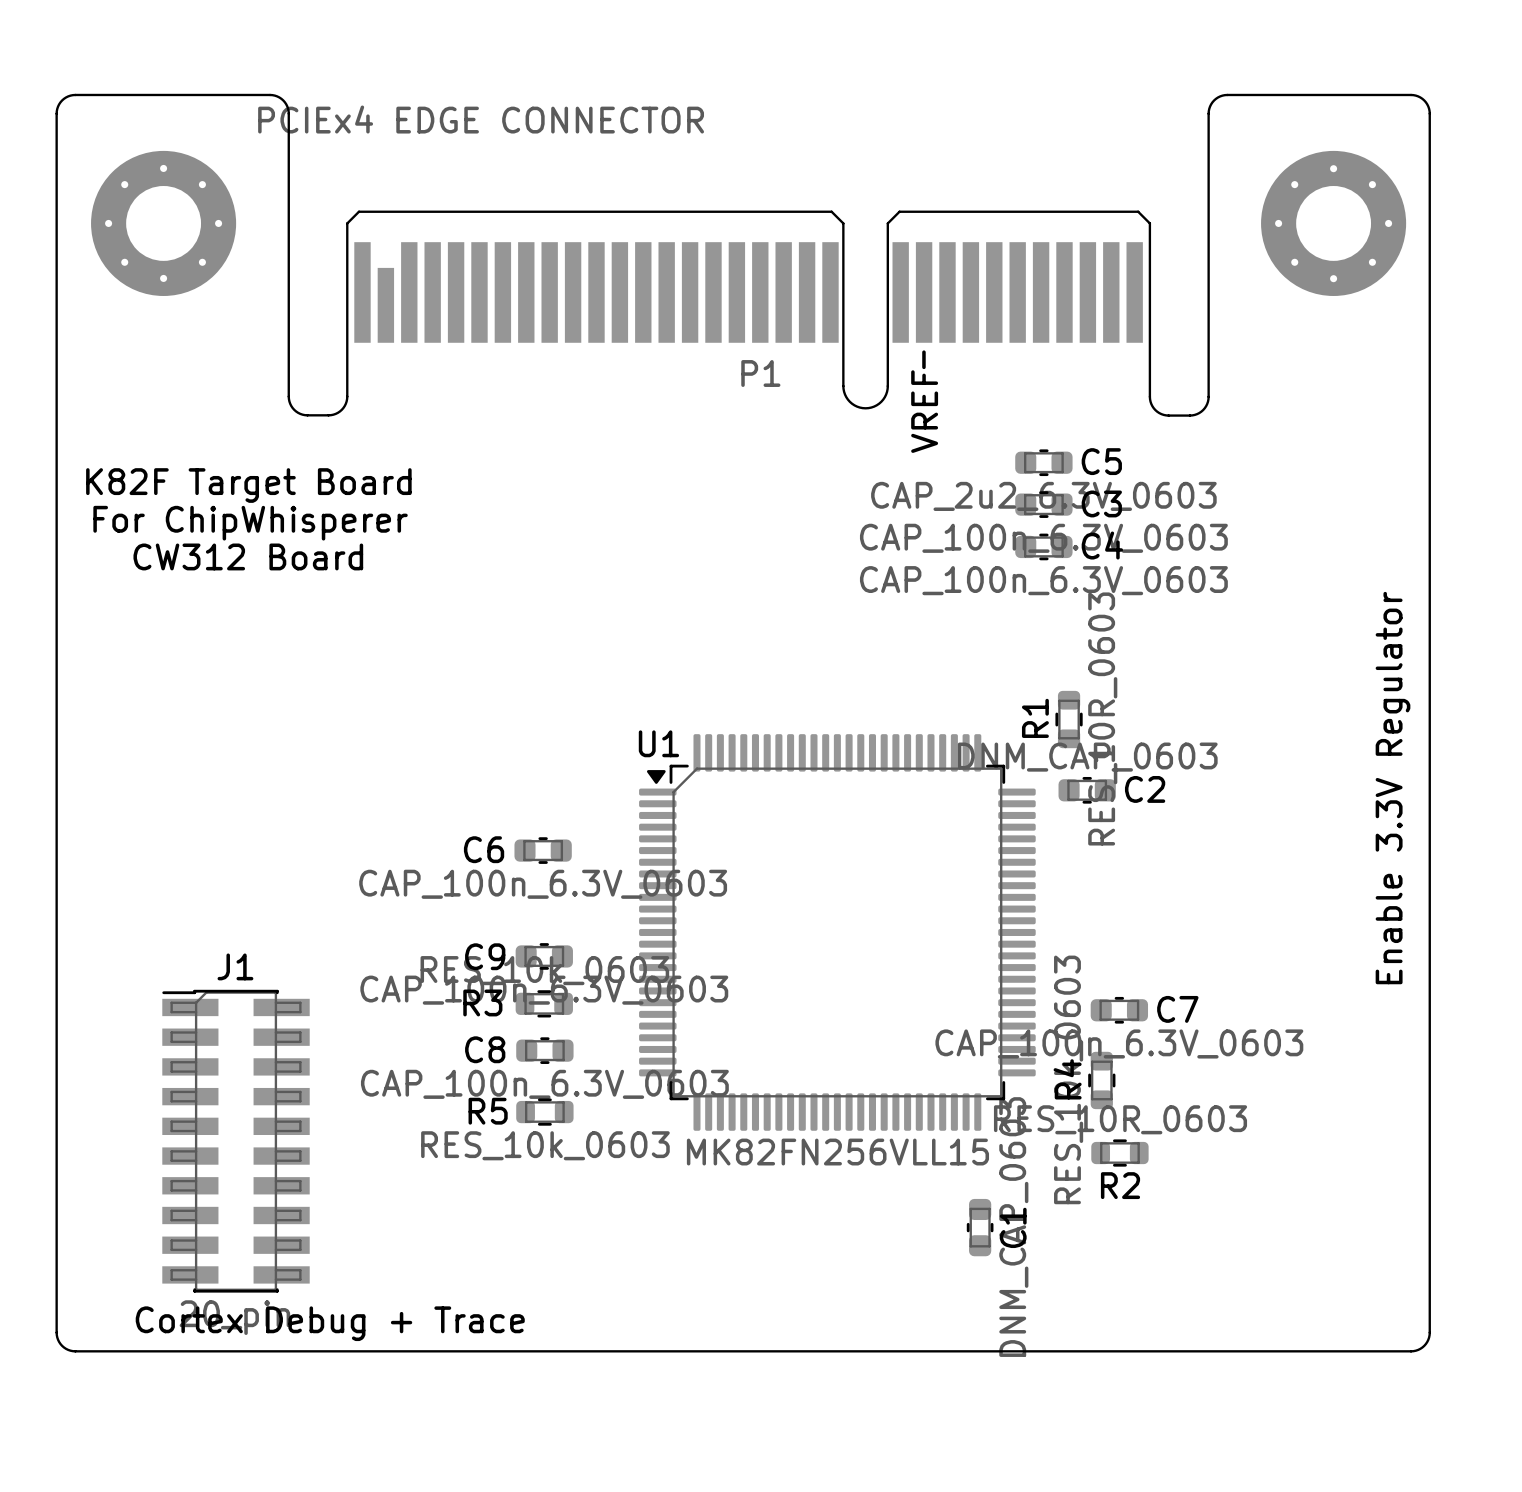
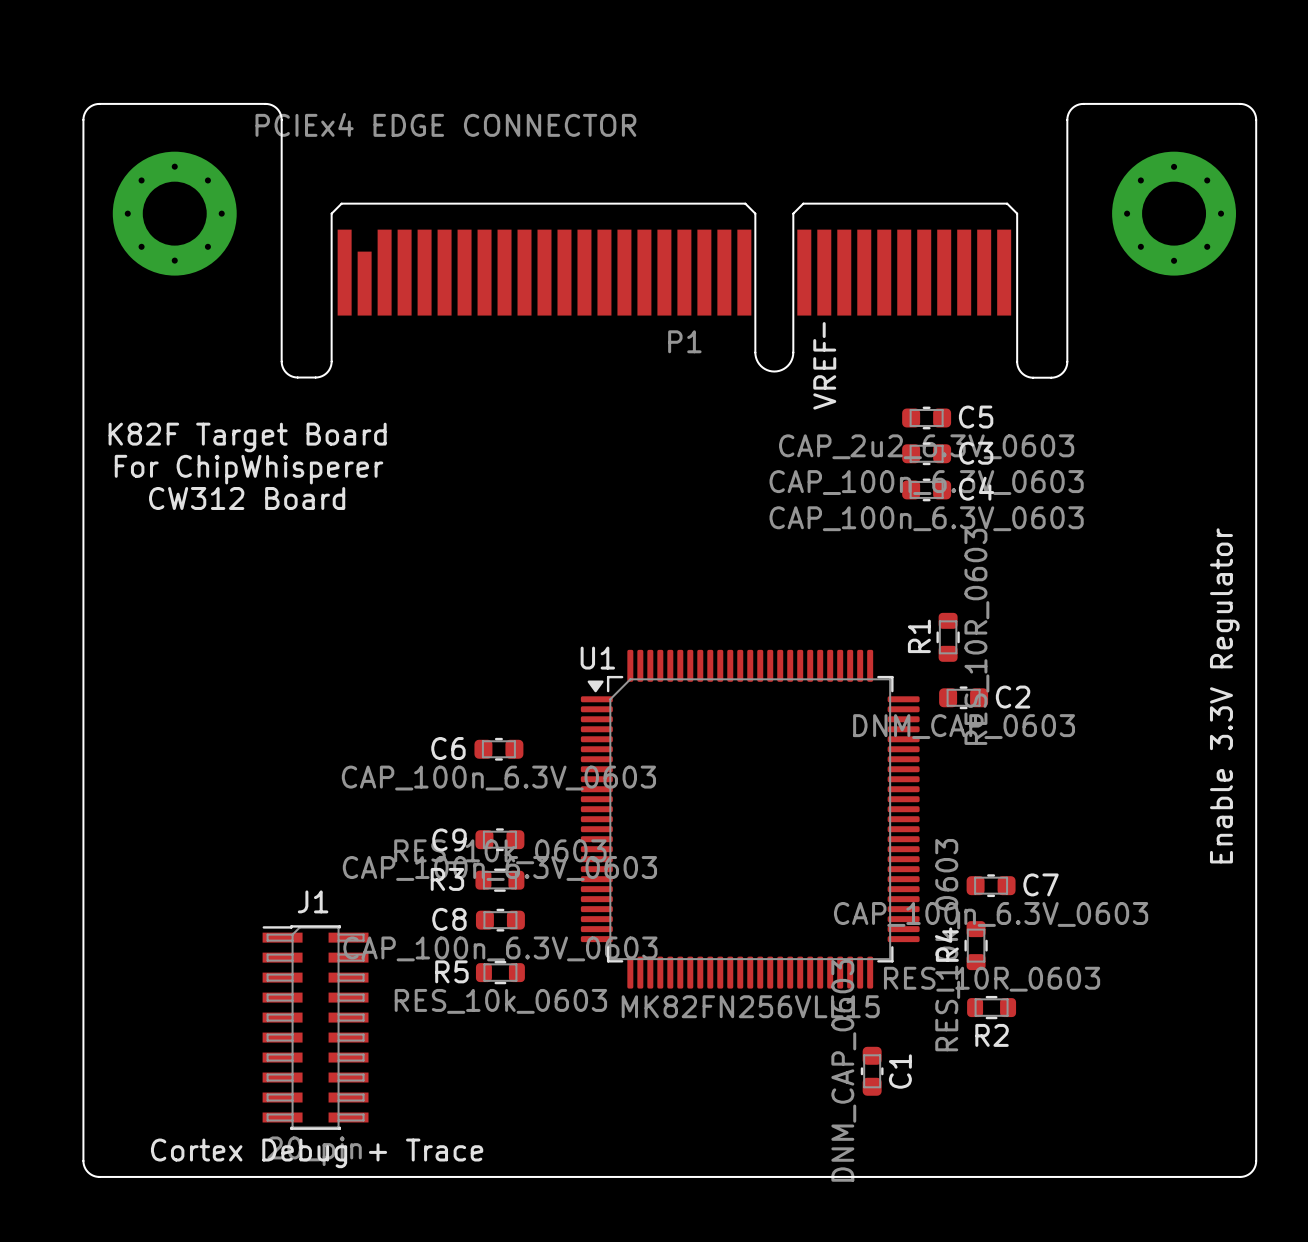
C2 value position: DNM_CAP_0603 (1087, 757) -> DNM_CAP_0603 (964, 726)
J1 footprint: [162, 989, 310, 1293] -> [262, 925, 369, 1130]
C1 value position: DNM_CAP_0603 (1013, 1227) -> DNM_CAP_0603 (843, 1070)

